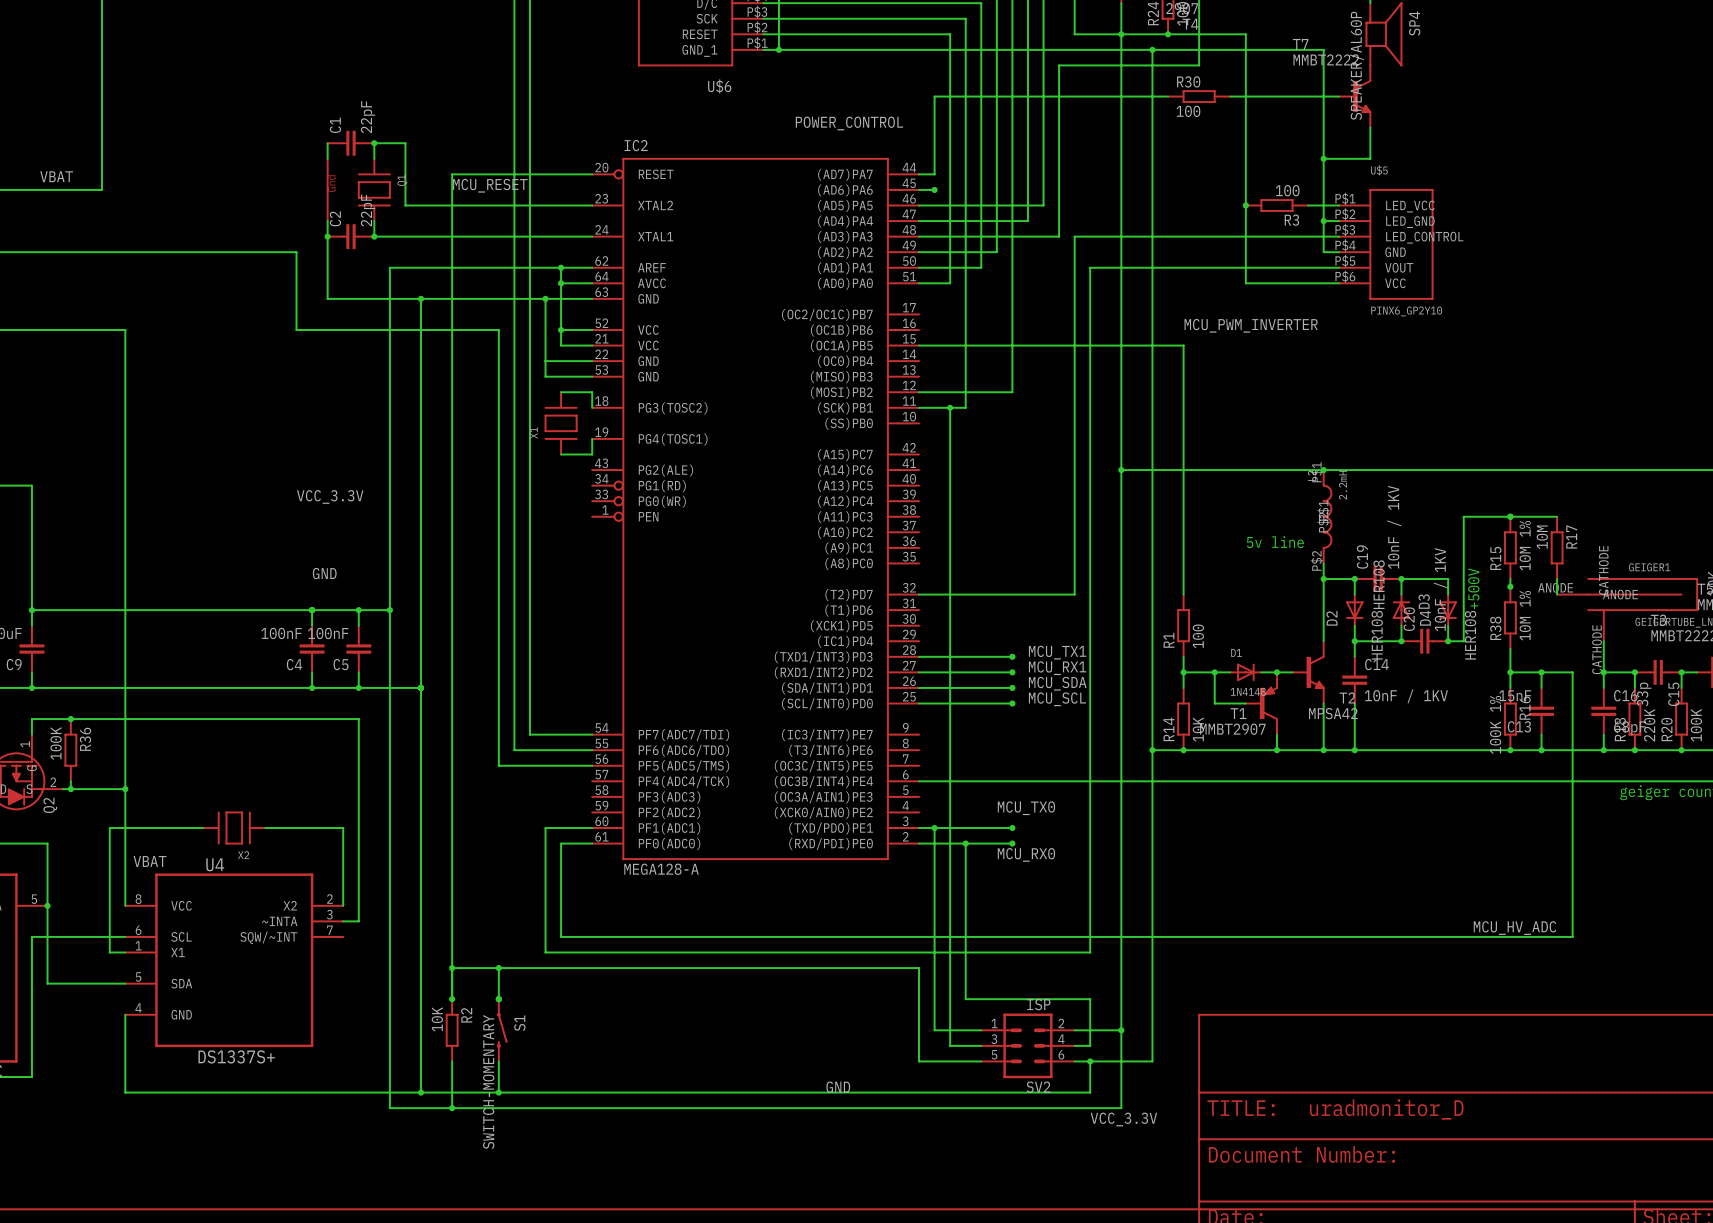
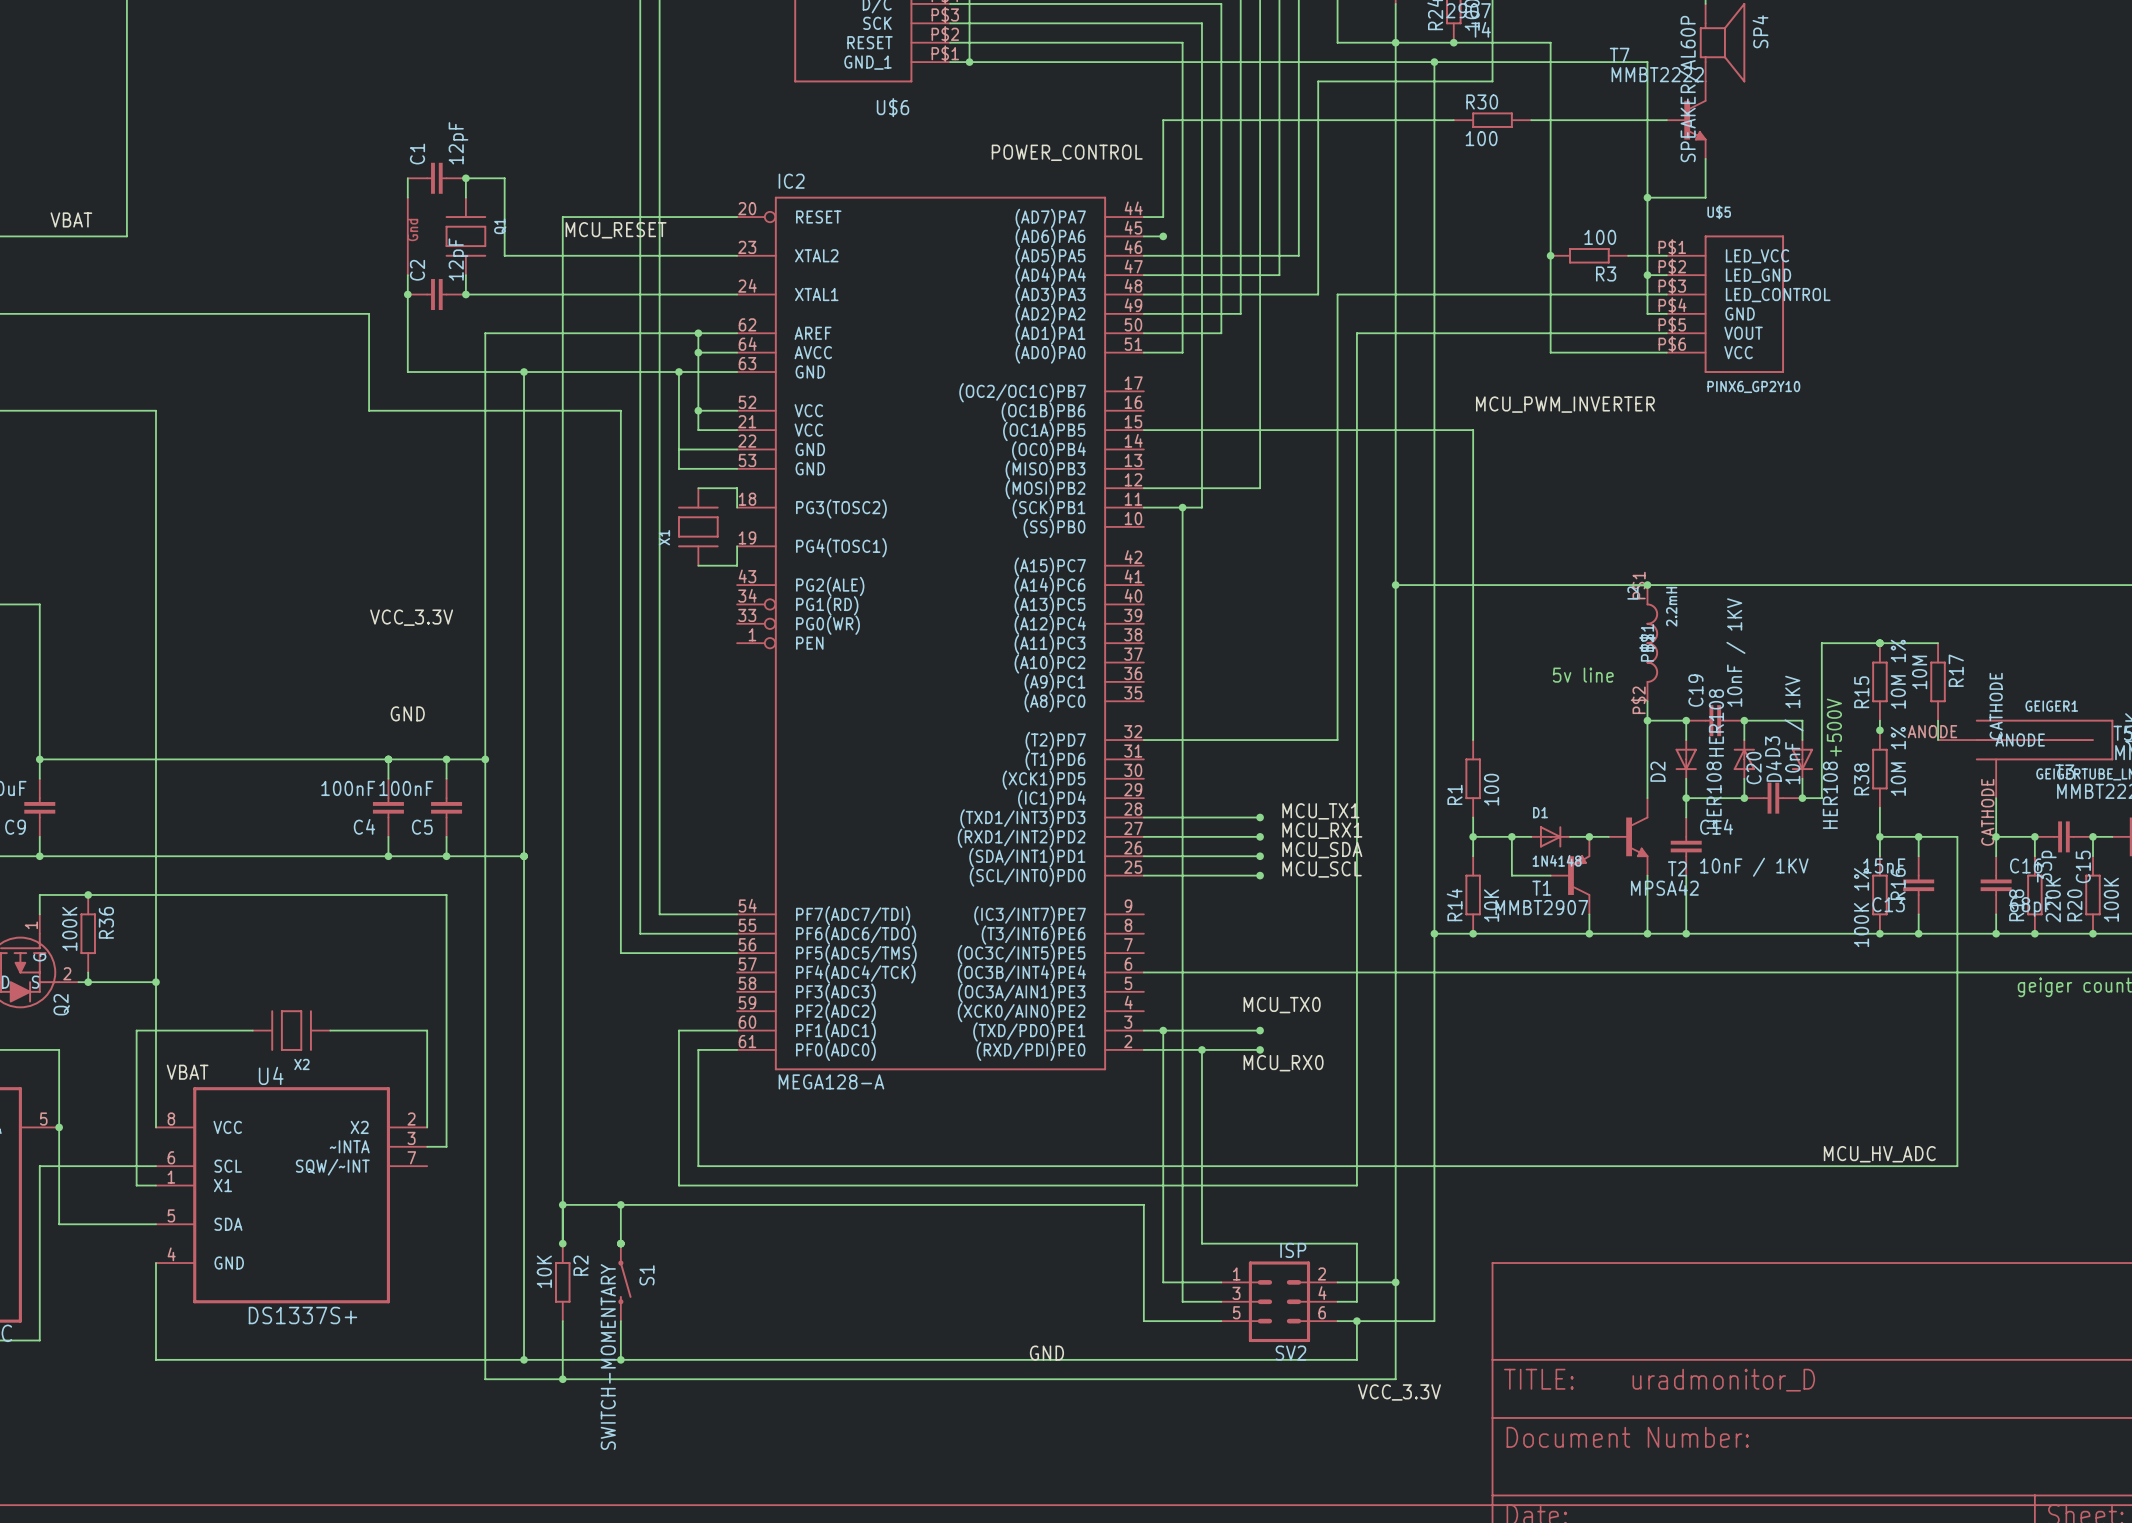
C1 value: 22pF (368, 117) -> 12pF (458, 143)
C2 value: 22pF (368, 210) -> 12pF (458, 259)

